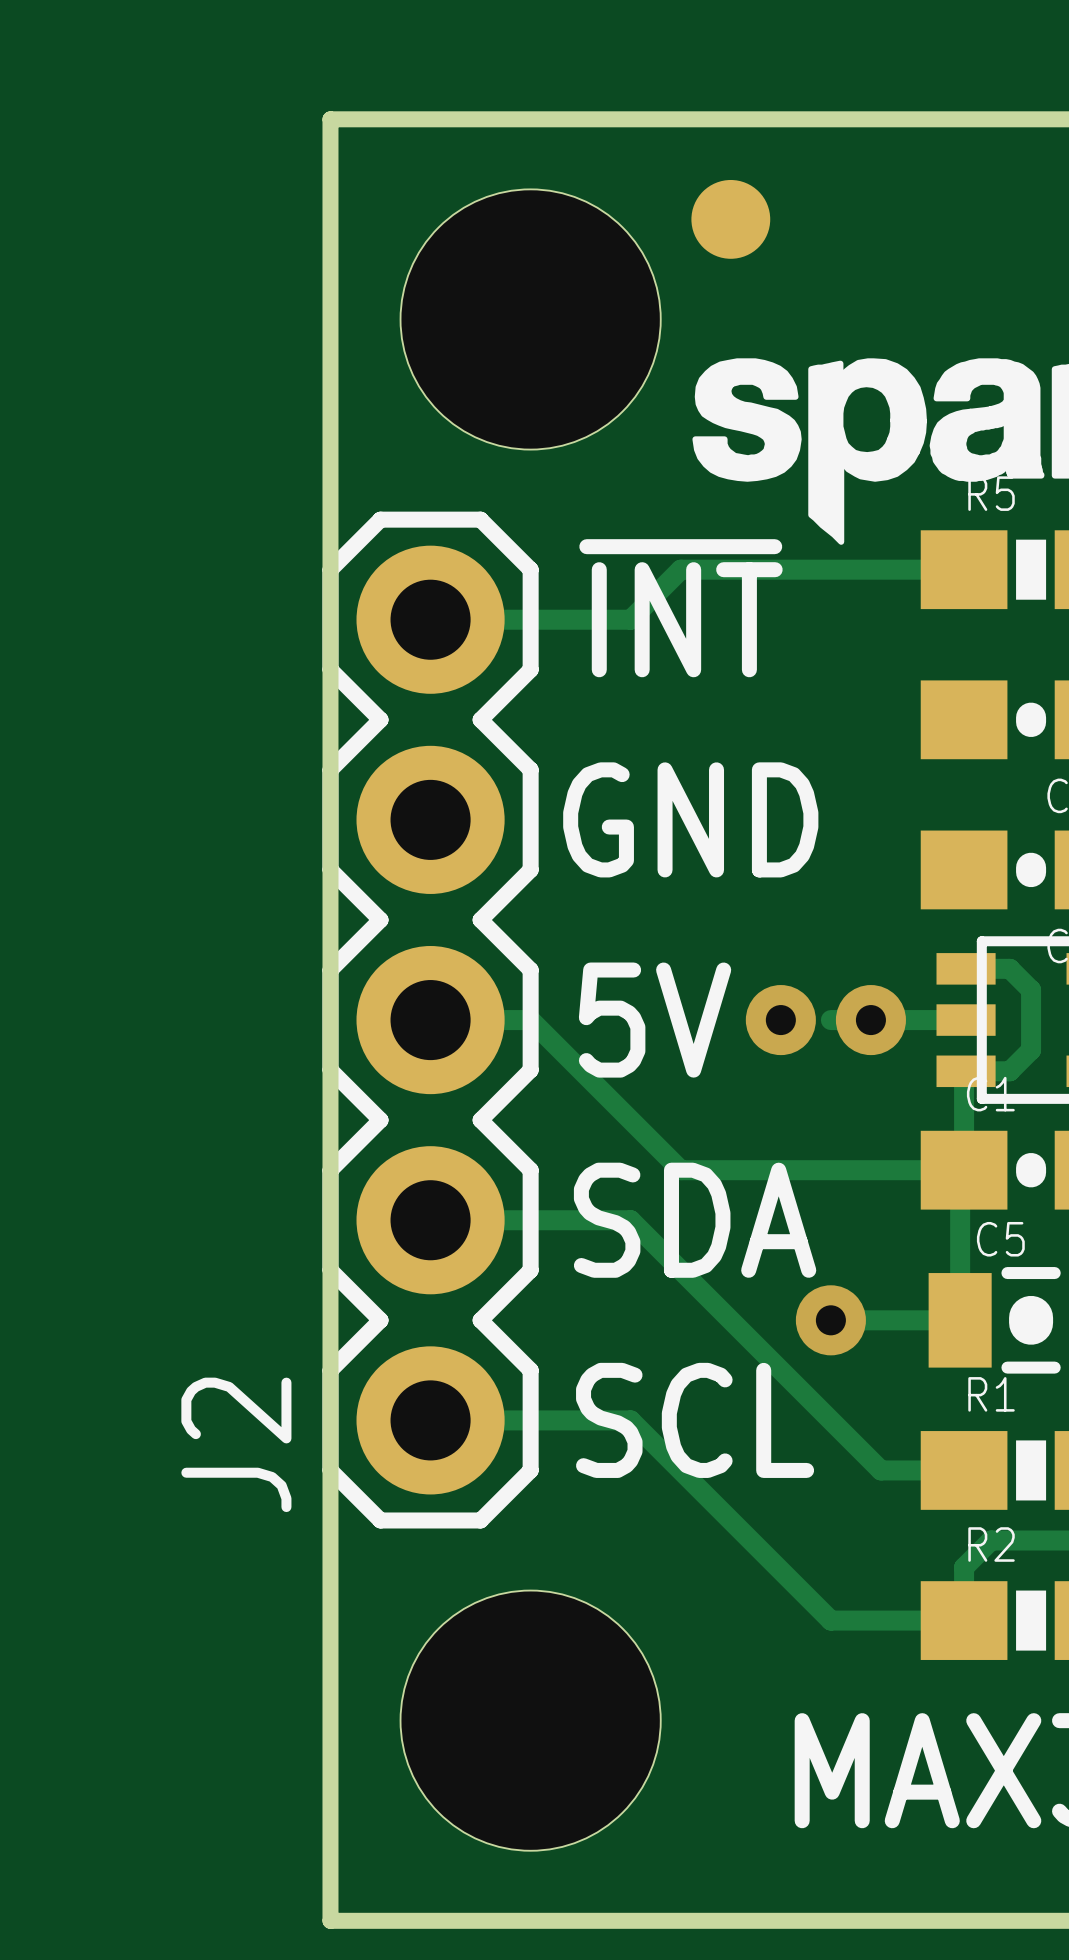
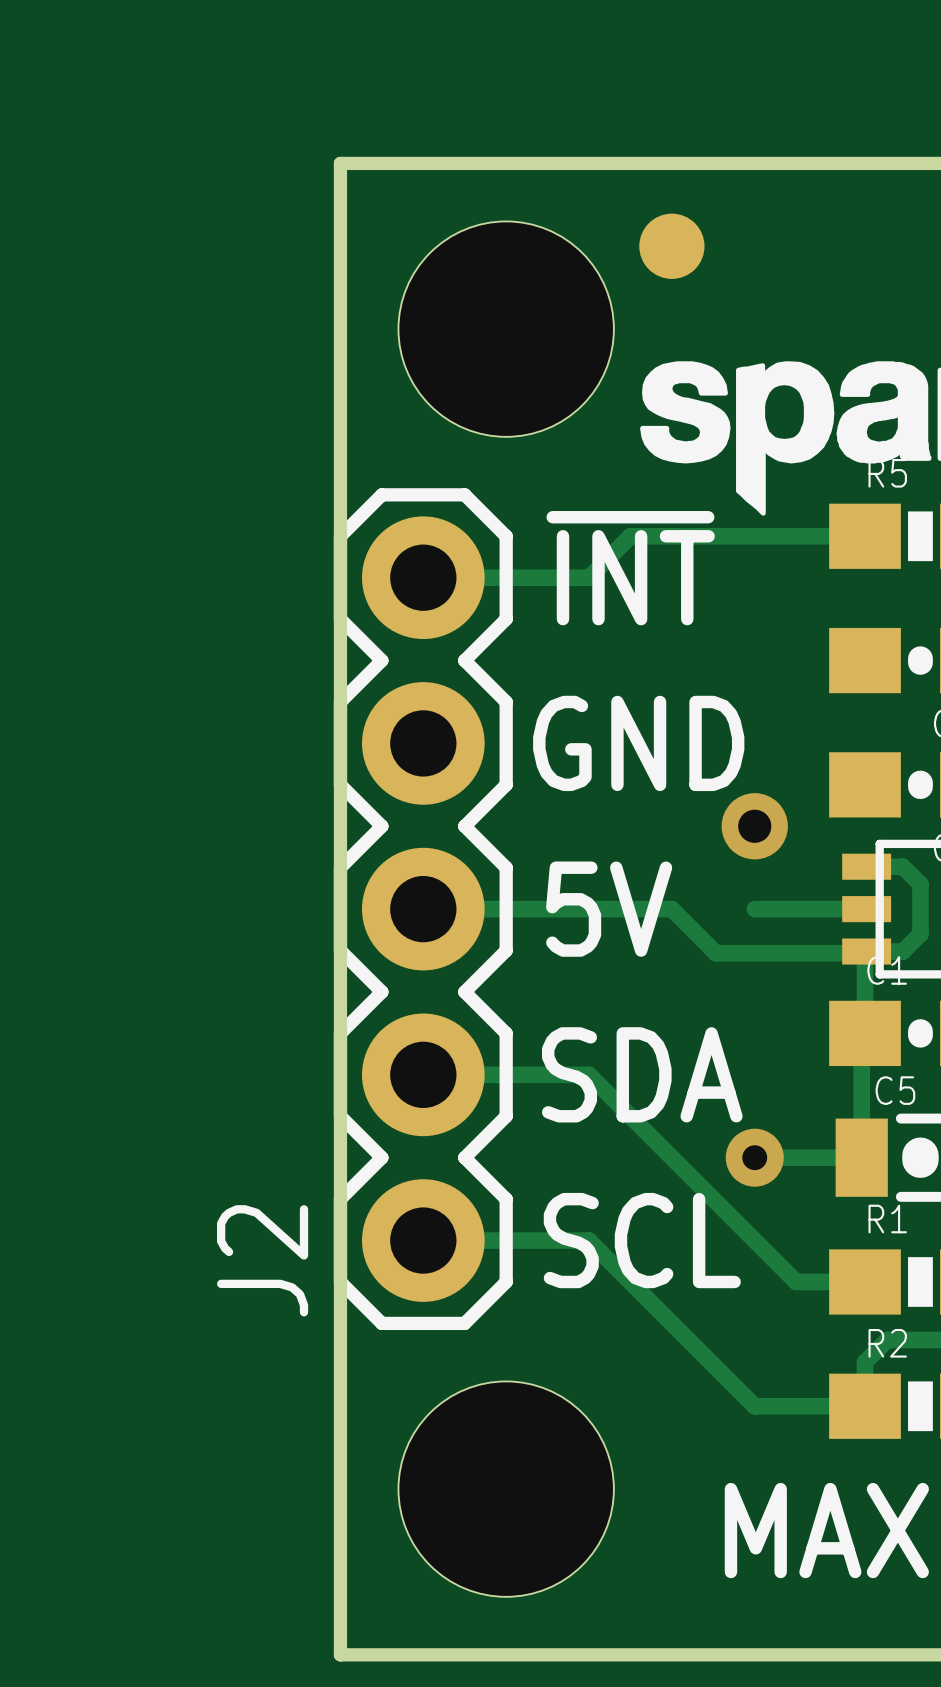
via: none -> (754, 826)
track: (530, 1020) (680, 1170) (964, 1170) -> (506, 909) (671, 909) (715, 953) (865, 953)
via: (780, 1020) -> none
via: (870, 1020) -> none

